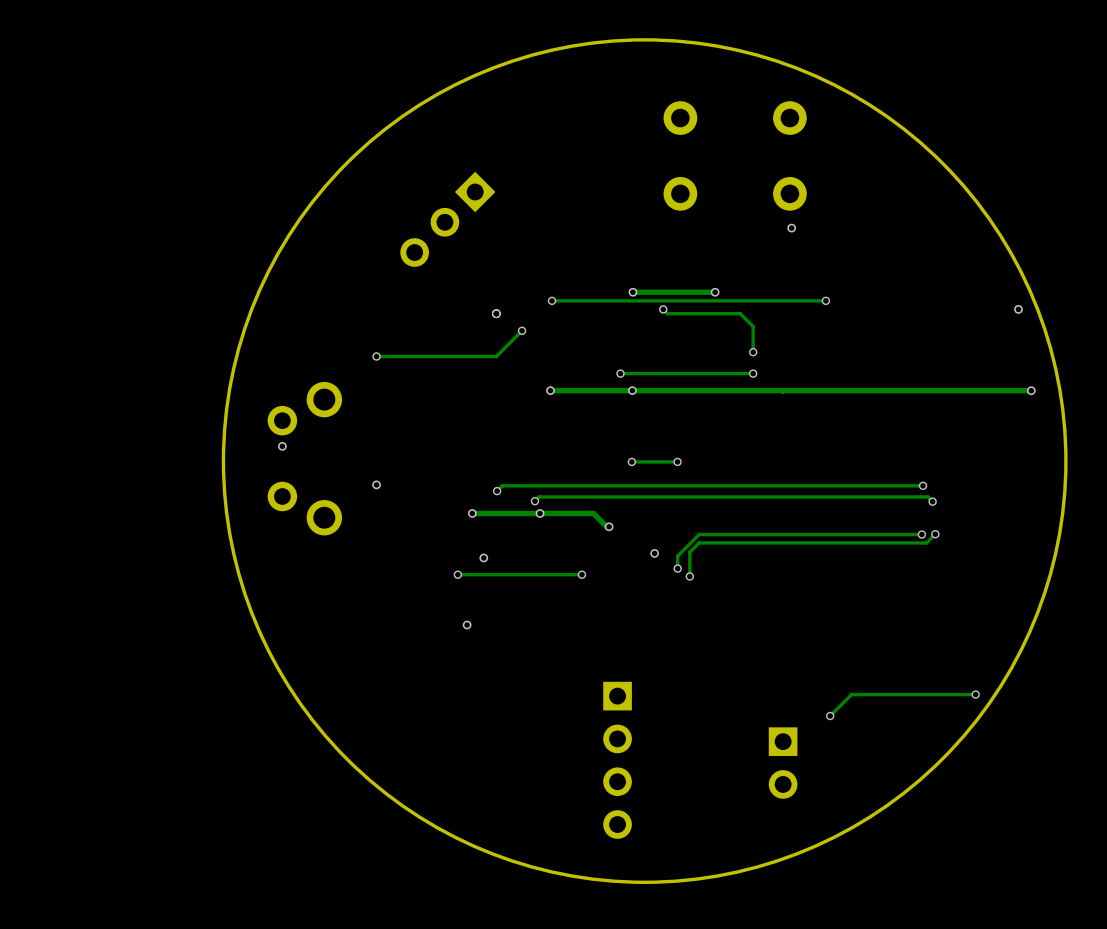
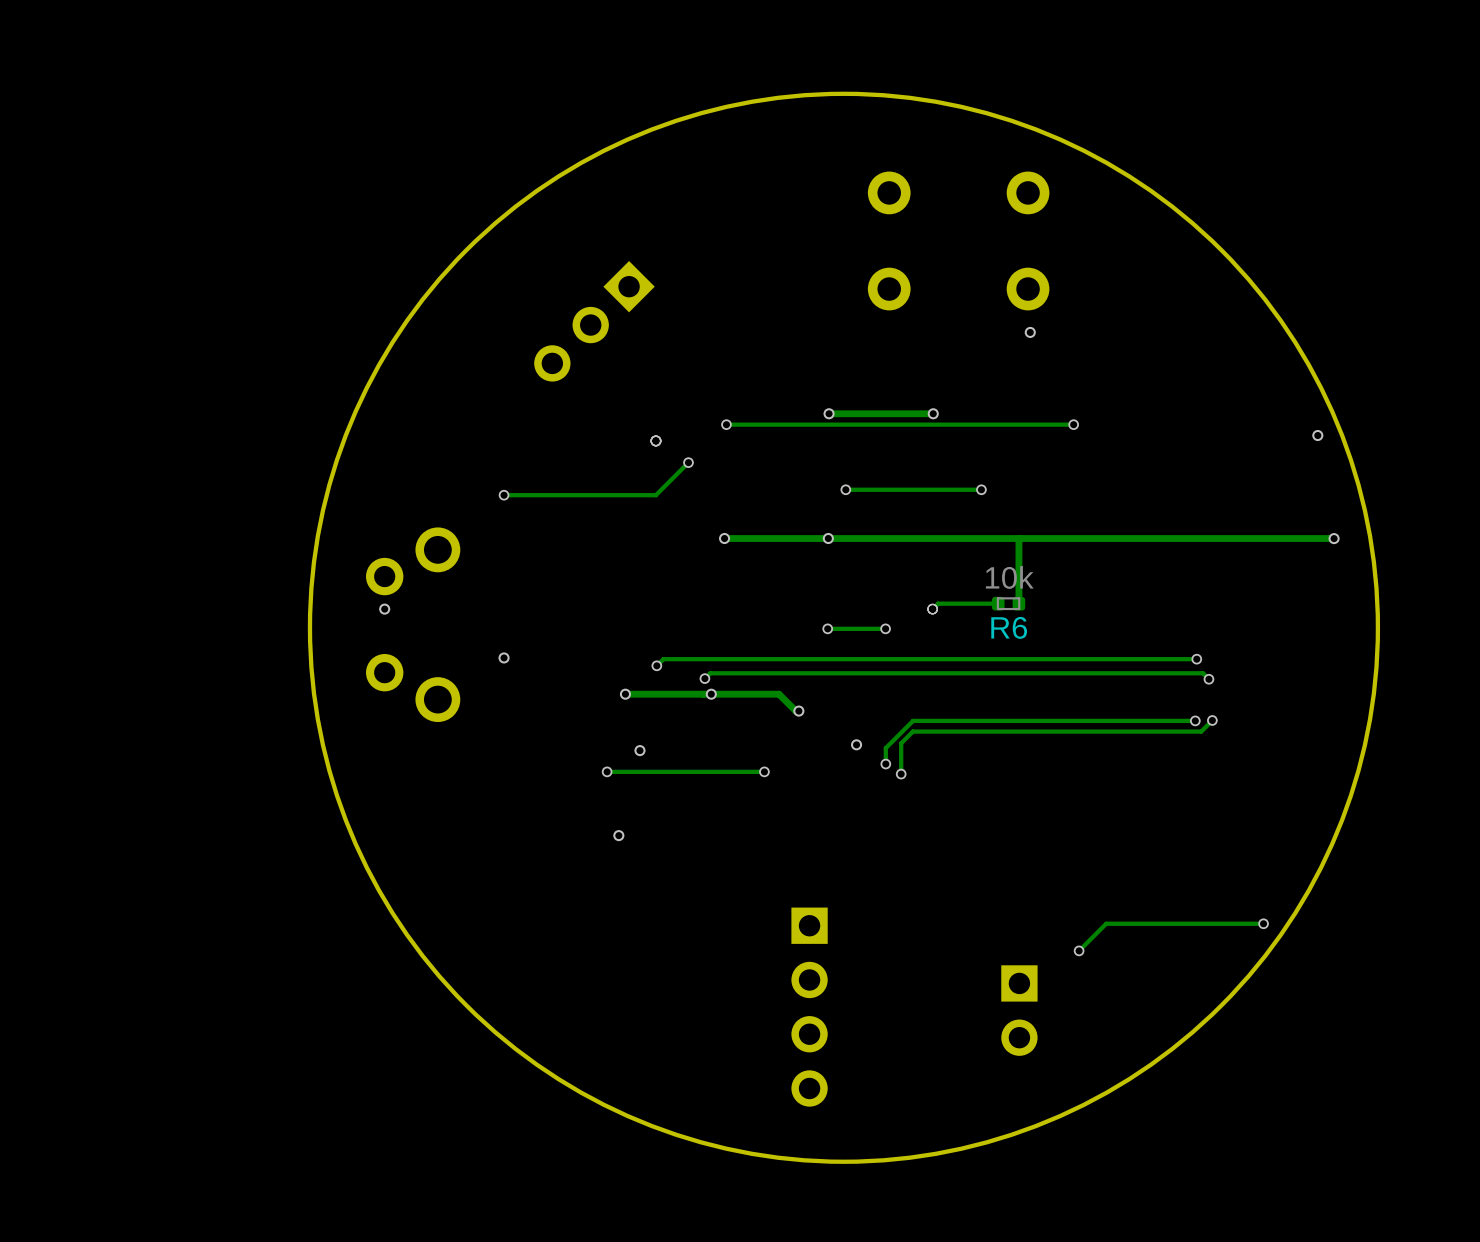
track: (663, 309) (667, 313) (740, 313) (753, 326) (753, 352) -> (845, 489) (981, 489)
via: (663, 309) -> none
via: none -> (845, 489)
via: (620, 373) -> none
track: (753, 373) (620, 373) -> none
via: (753, 373) -> none
track: none -> (1018, 538) (1018, 603)
track: none -> (998, 603) (938, 603) (932, 609)
R6: none -> 10k (1008, 603)
via: none -> (932, 609)

